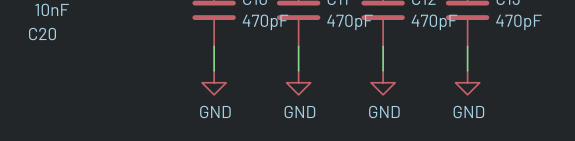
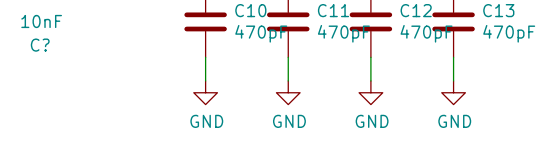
C20 name: C20 (42, 34) -> C? (40, 45)

